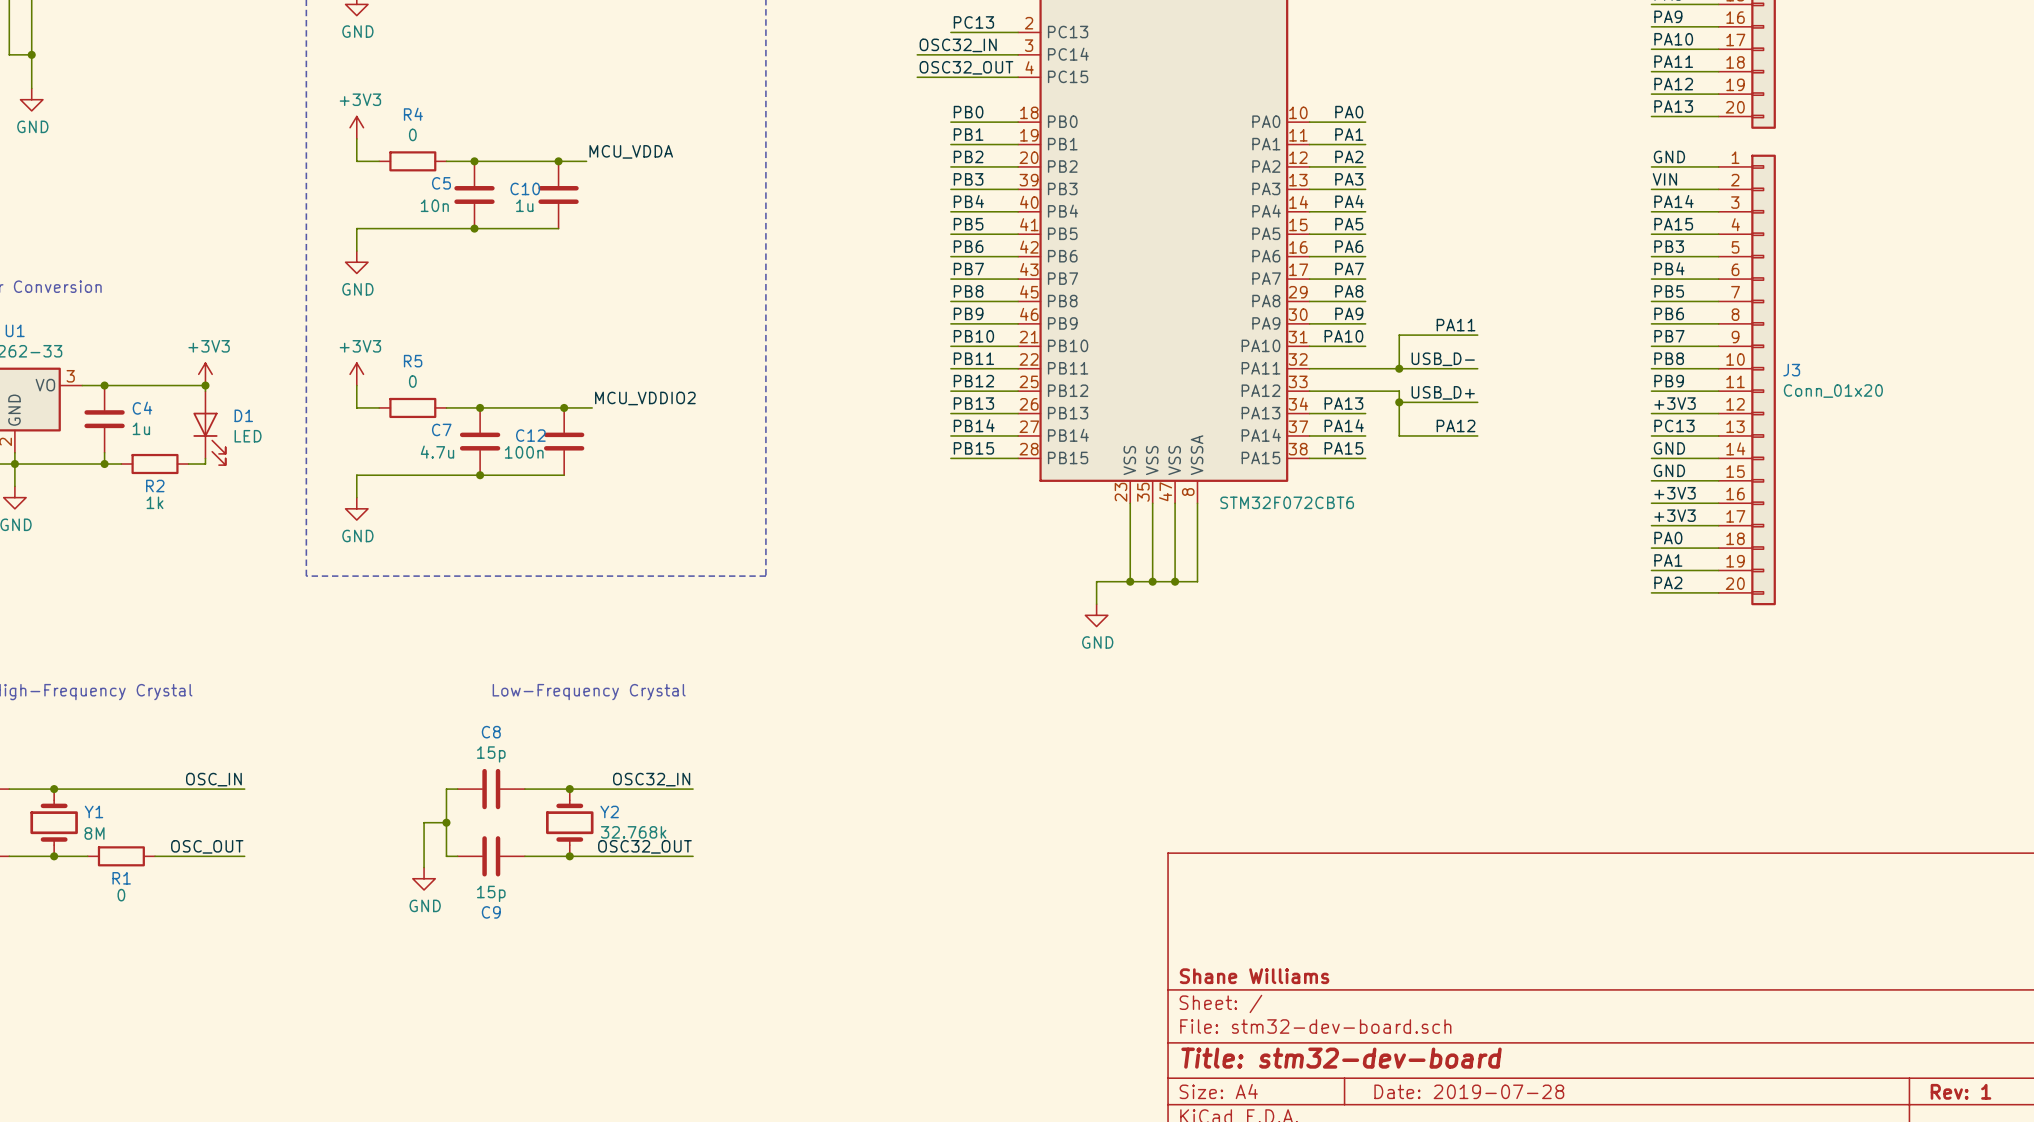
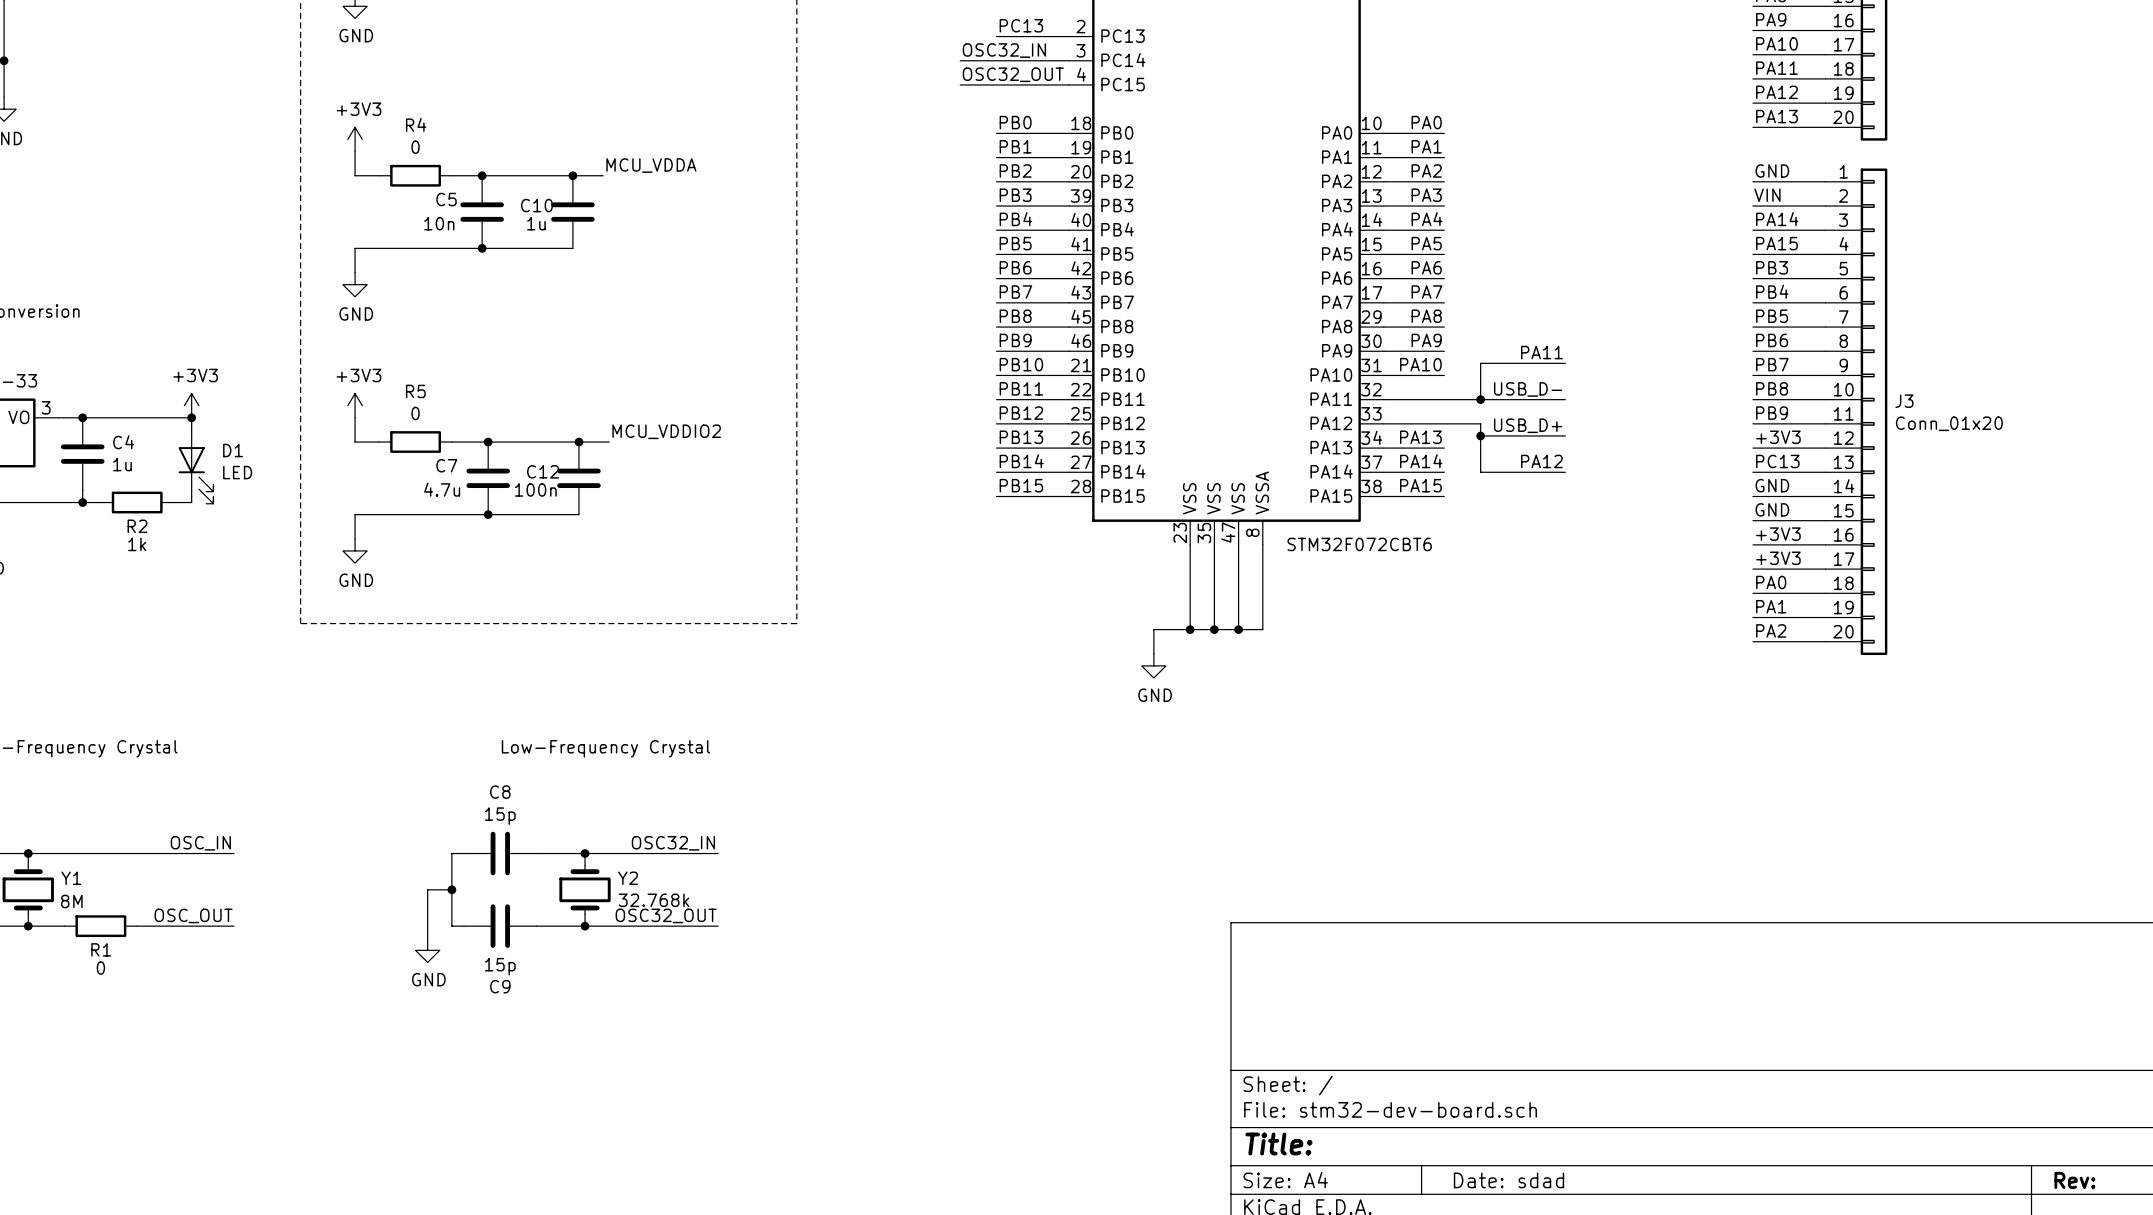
title block: Shane Williams (1254, 976) -> none
title block: Title: stm32-dev-board (1341, 1058) -> Title: (1278, 1144)
title block: Date: 2019-07-28 (1469, 1091) -> Date: sdad (1508, 1180)
title block: Rev: 1 (1960, 1091) -> Rev: (2074, 1180)

